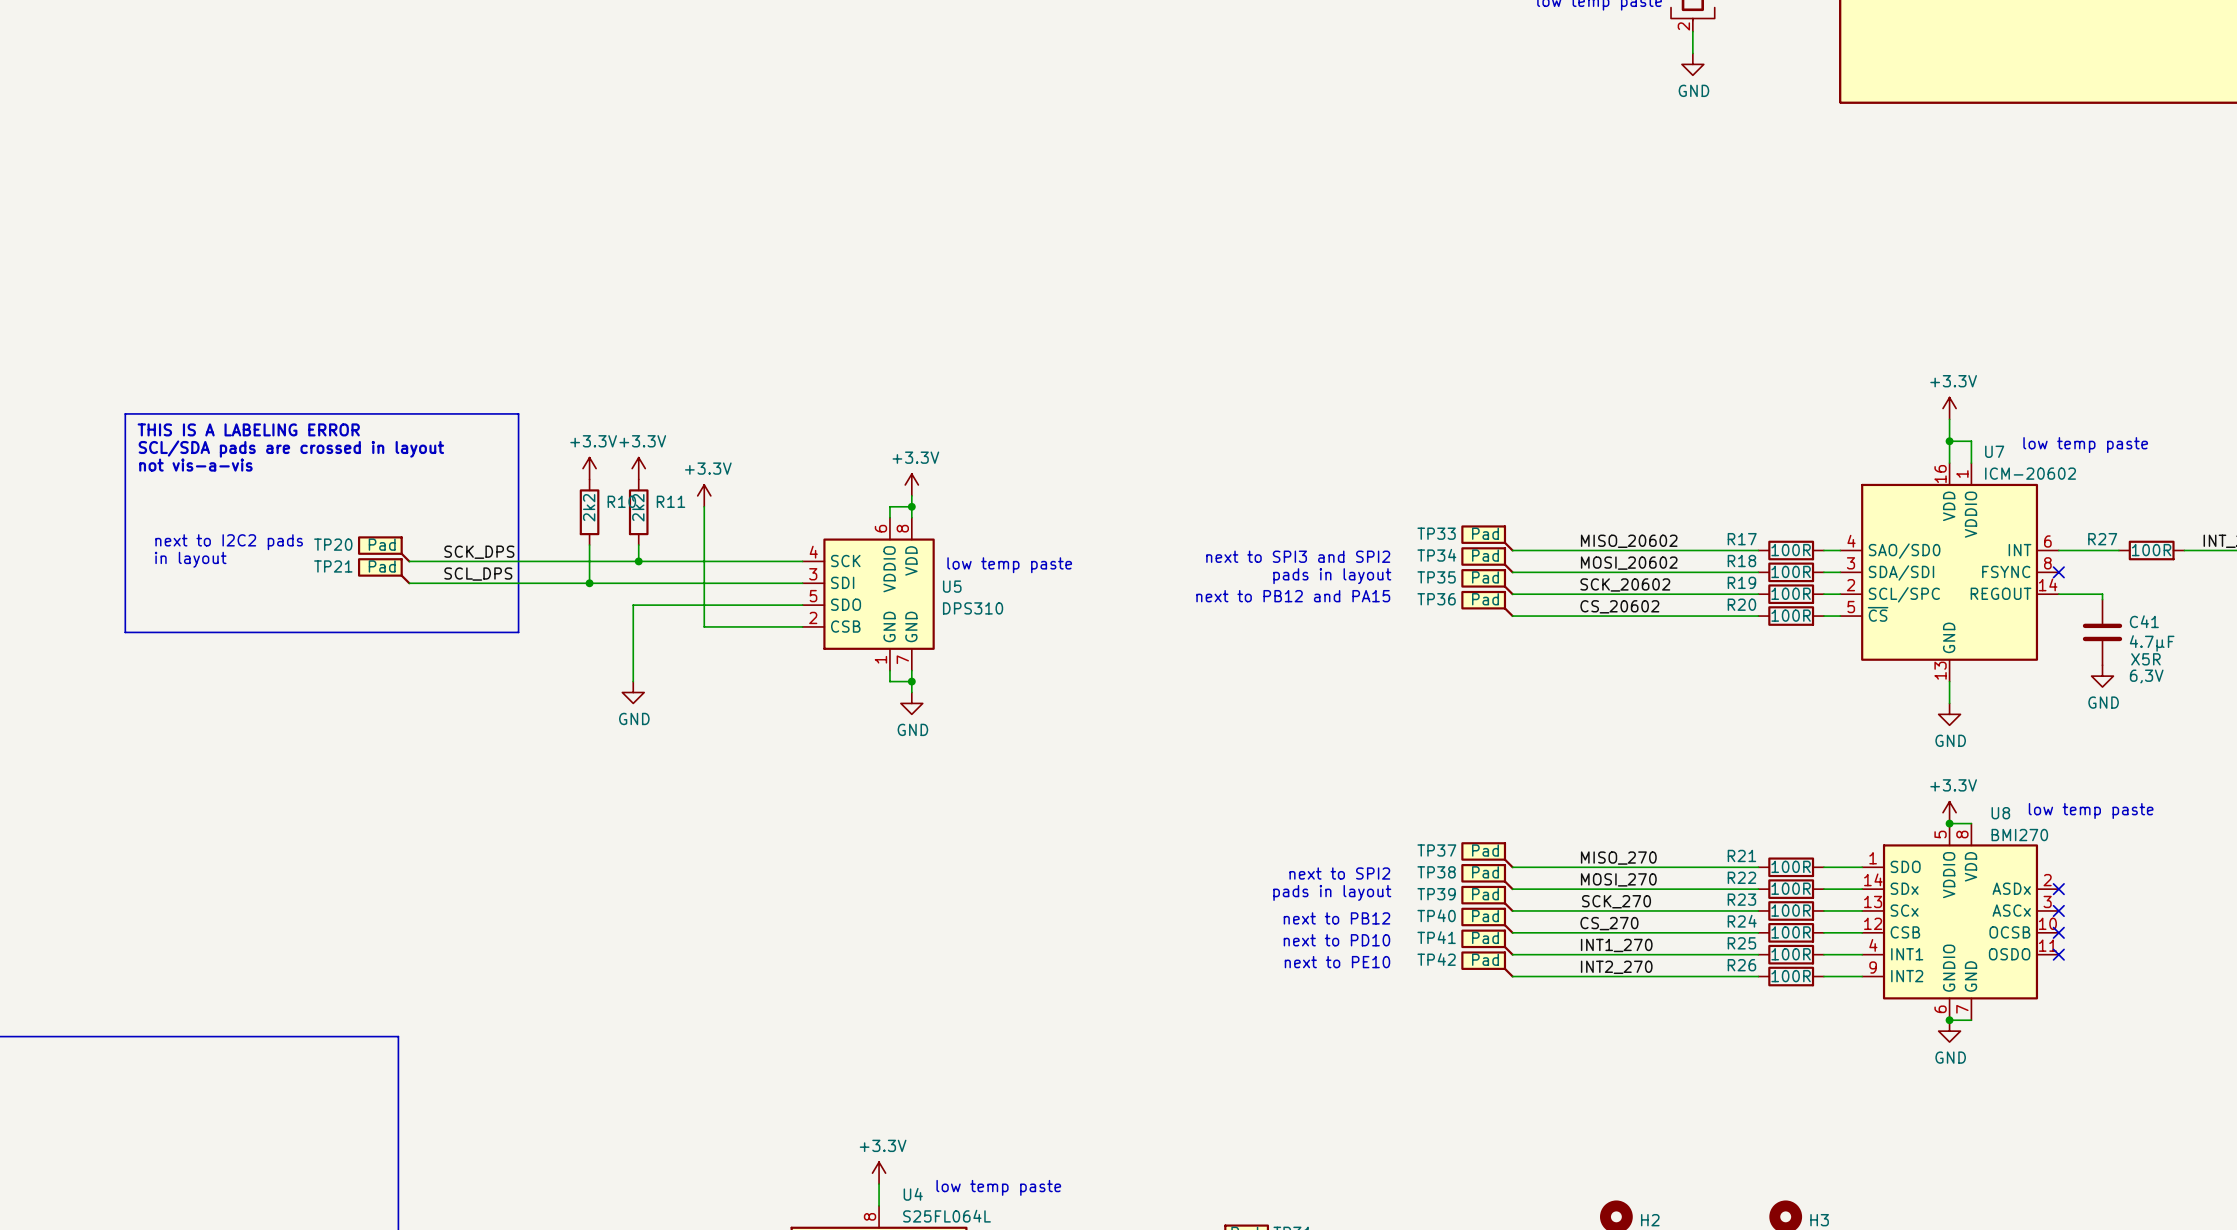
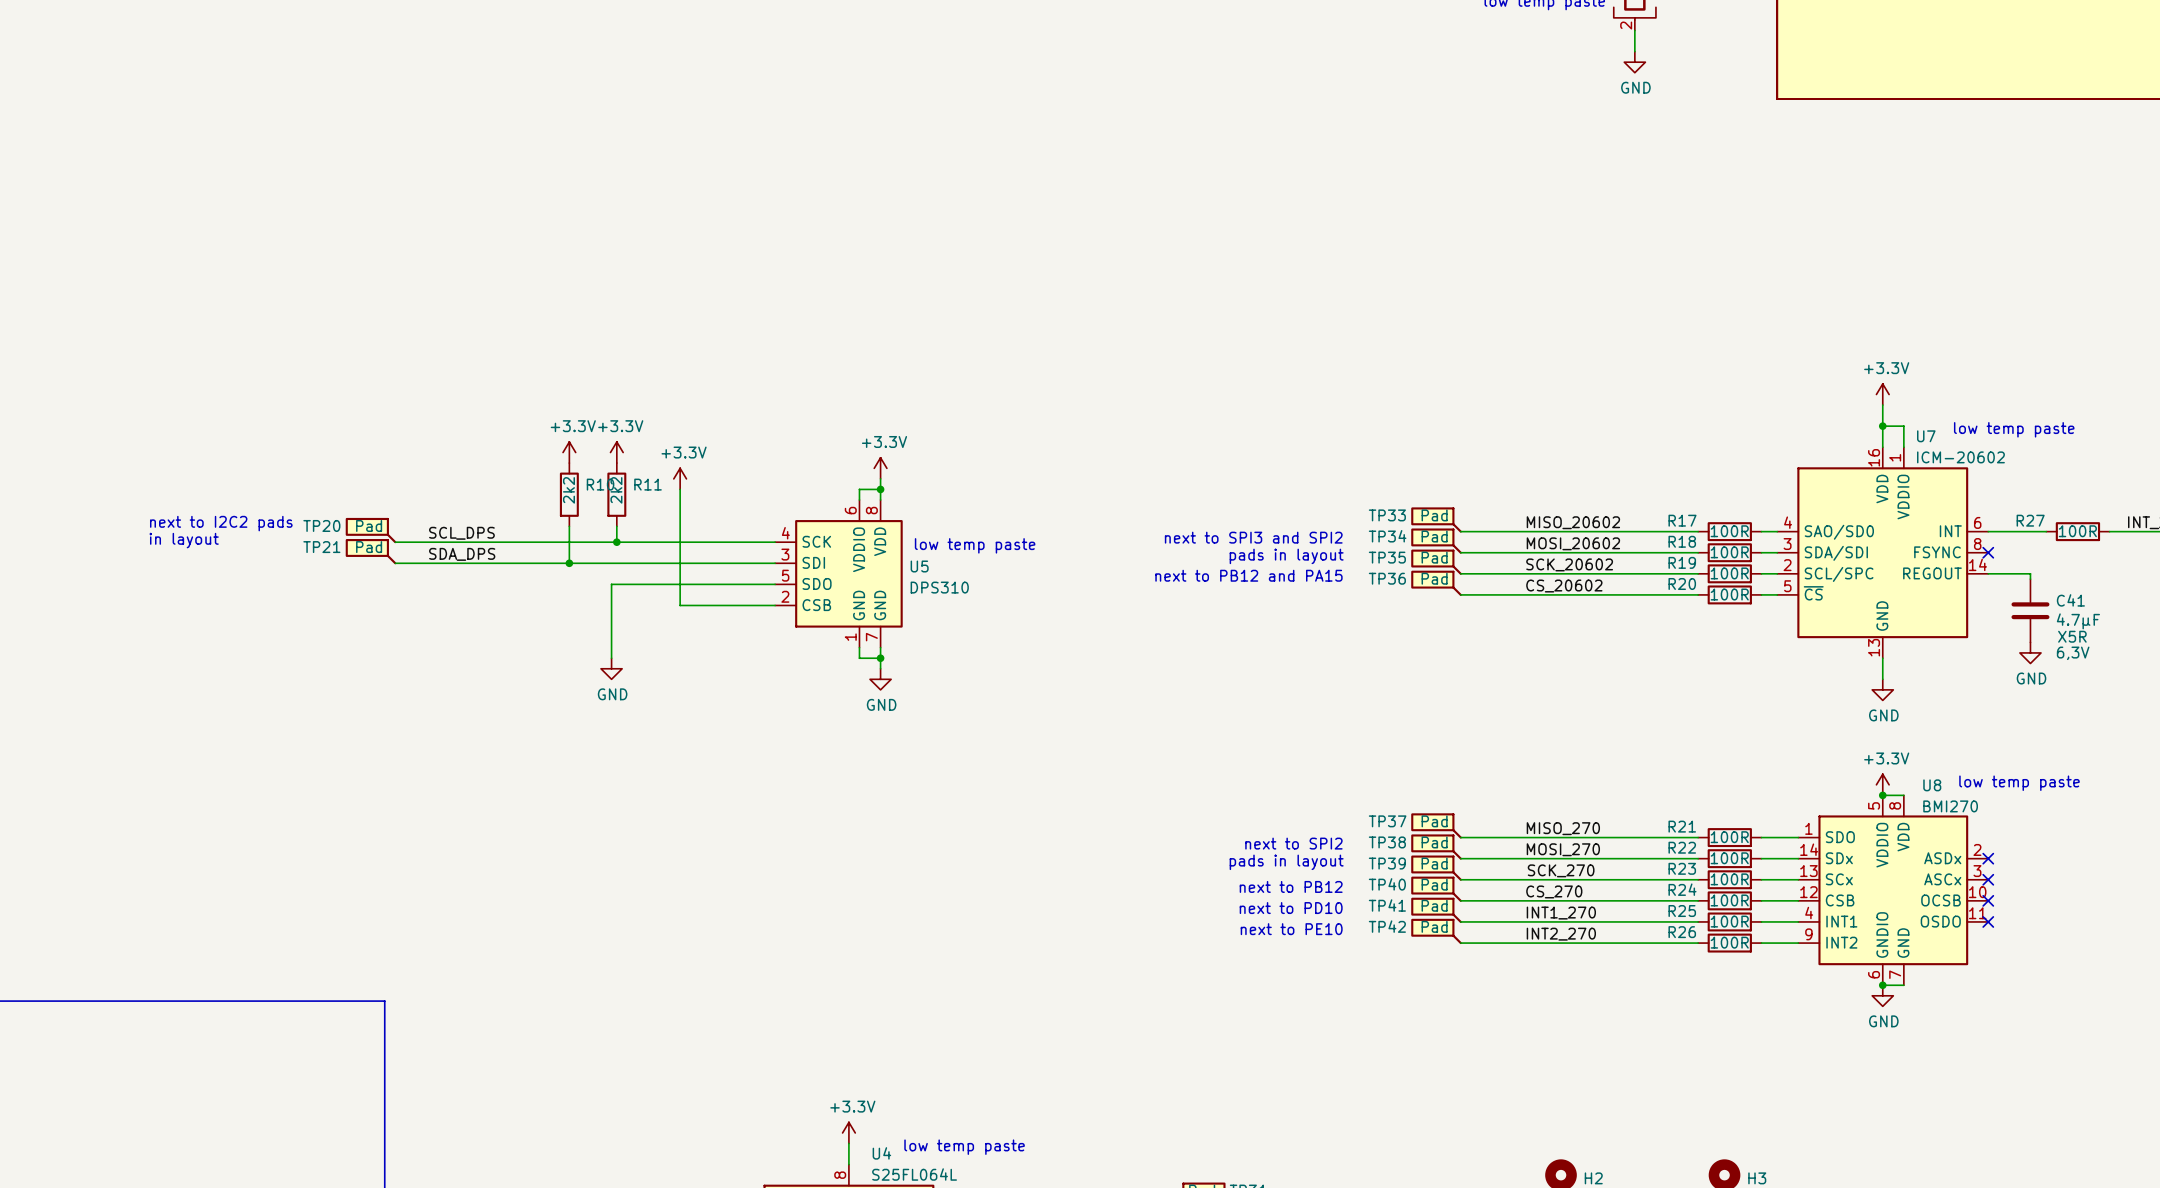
line: (125, 413) (125, 632) (518, 632) (518, 413) (125, 413) -> none
text: THIS IS A LABELING ERROR (248, 429) -> none
text: SCL/SDA pads are crossed in layout (291, 449) -> none
text: not vis-a-vis (195, 465) -> none
label: SCK_DPS (479, 552) -> SCL_DPS (461, 533)
label: SCL_DPS (478, 574) -> SDA_DPS (462, 554)

